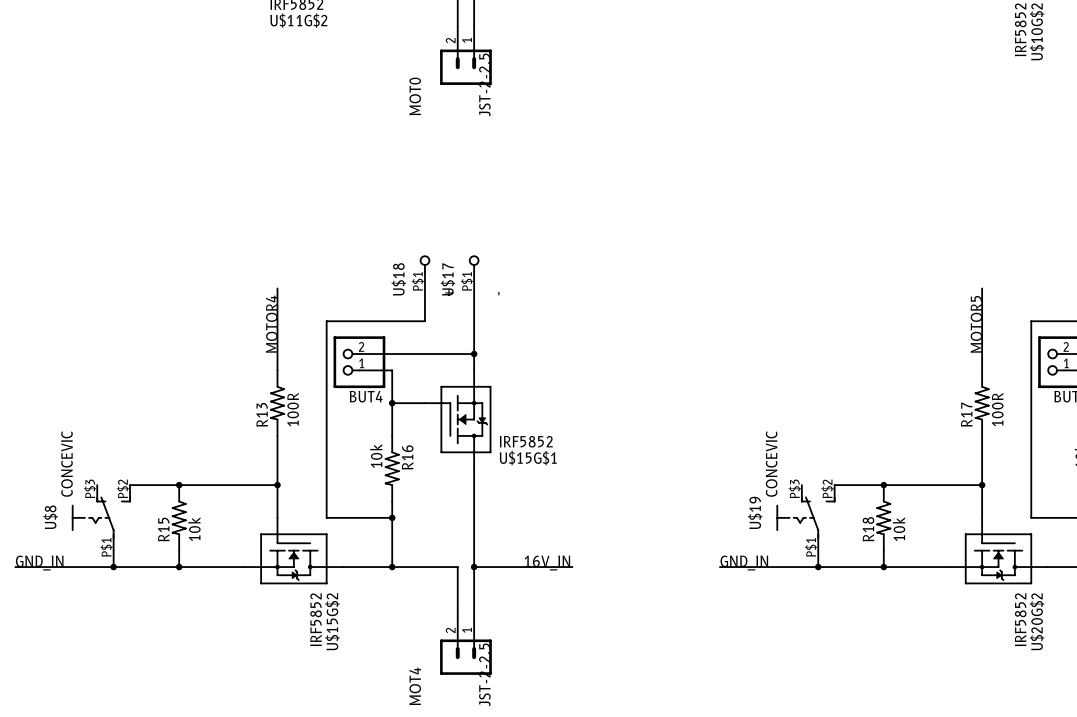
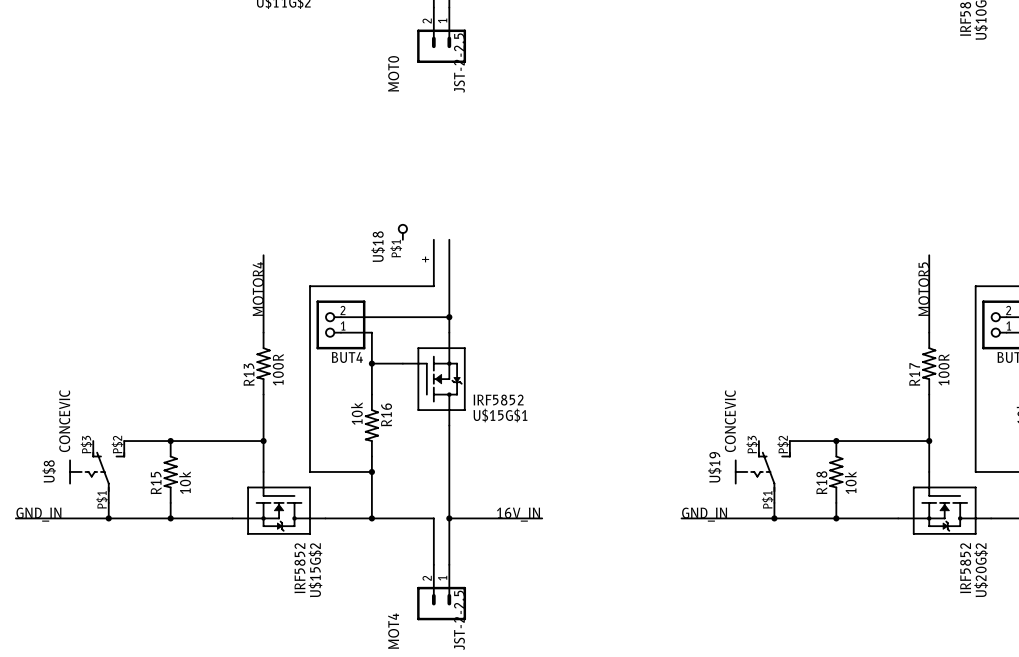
U$17: - (474, 264) -> none
wire: (424, 272) (424, 321) -> (433, 239) (433, 286) (402, 286)

